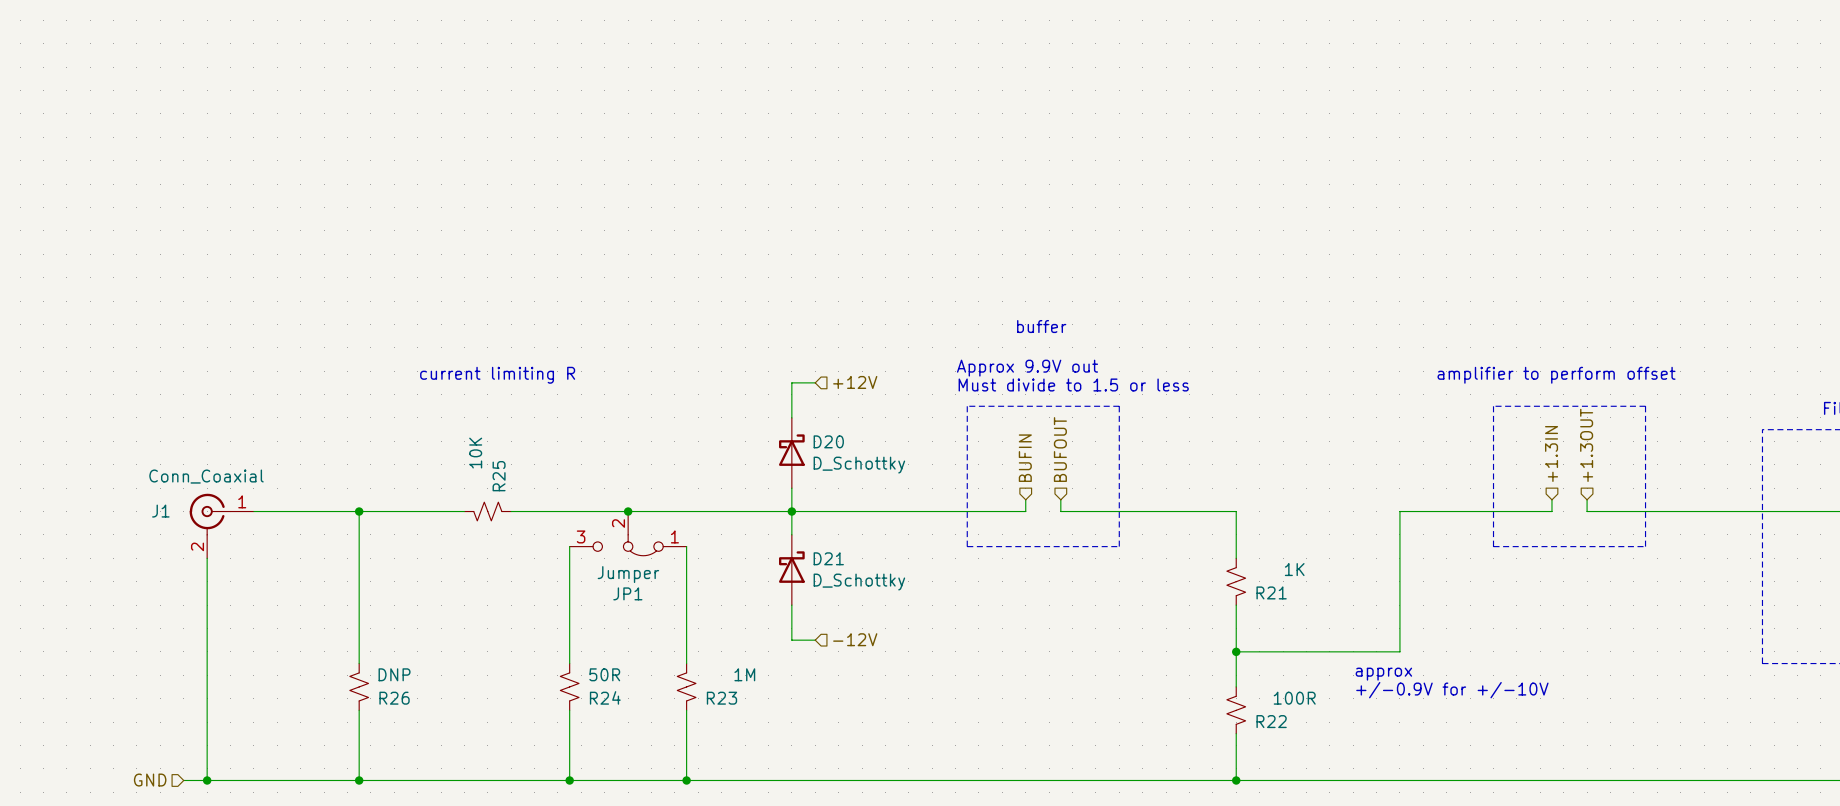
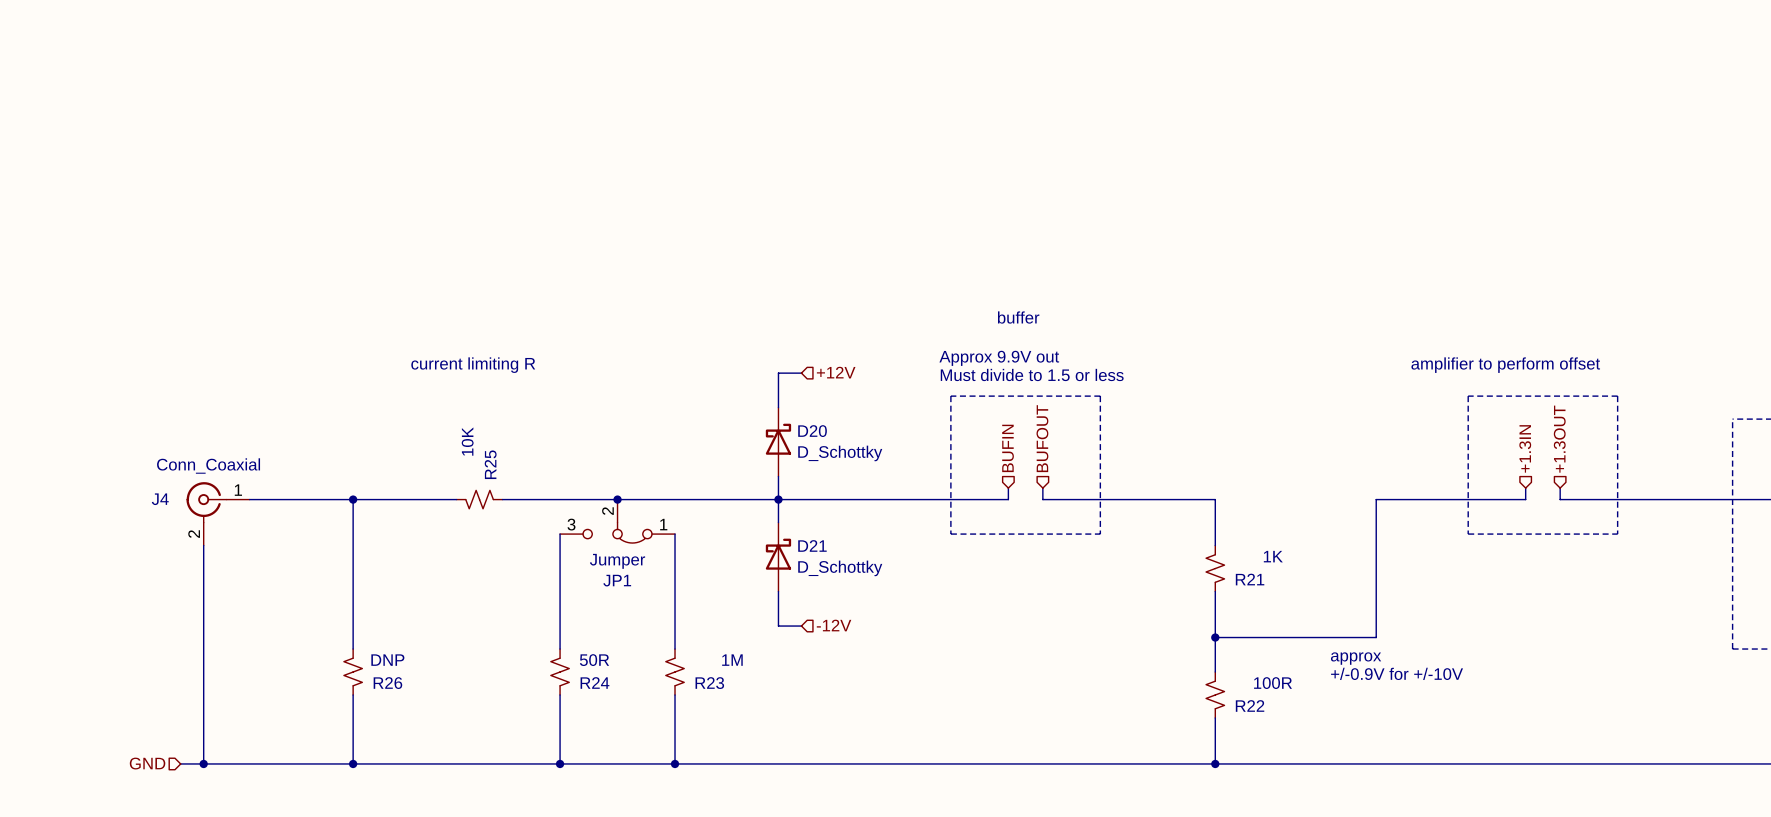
J1 name: J1 (160, 511) -> J4 (160, 499)

